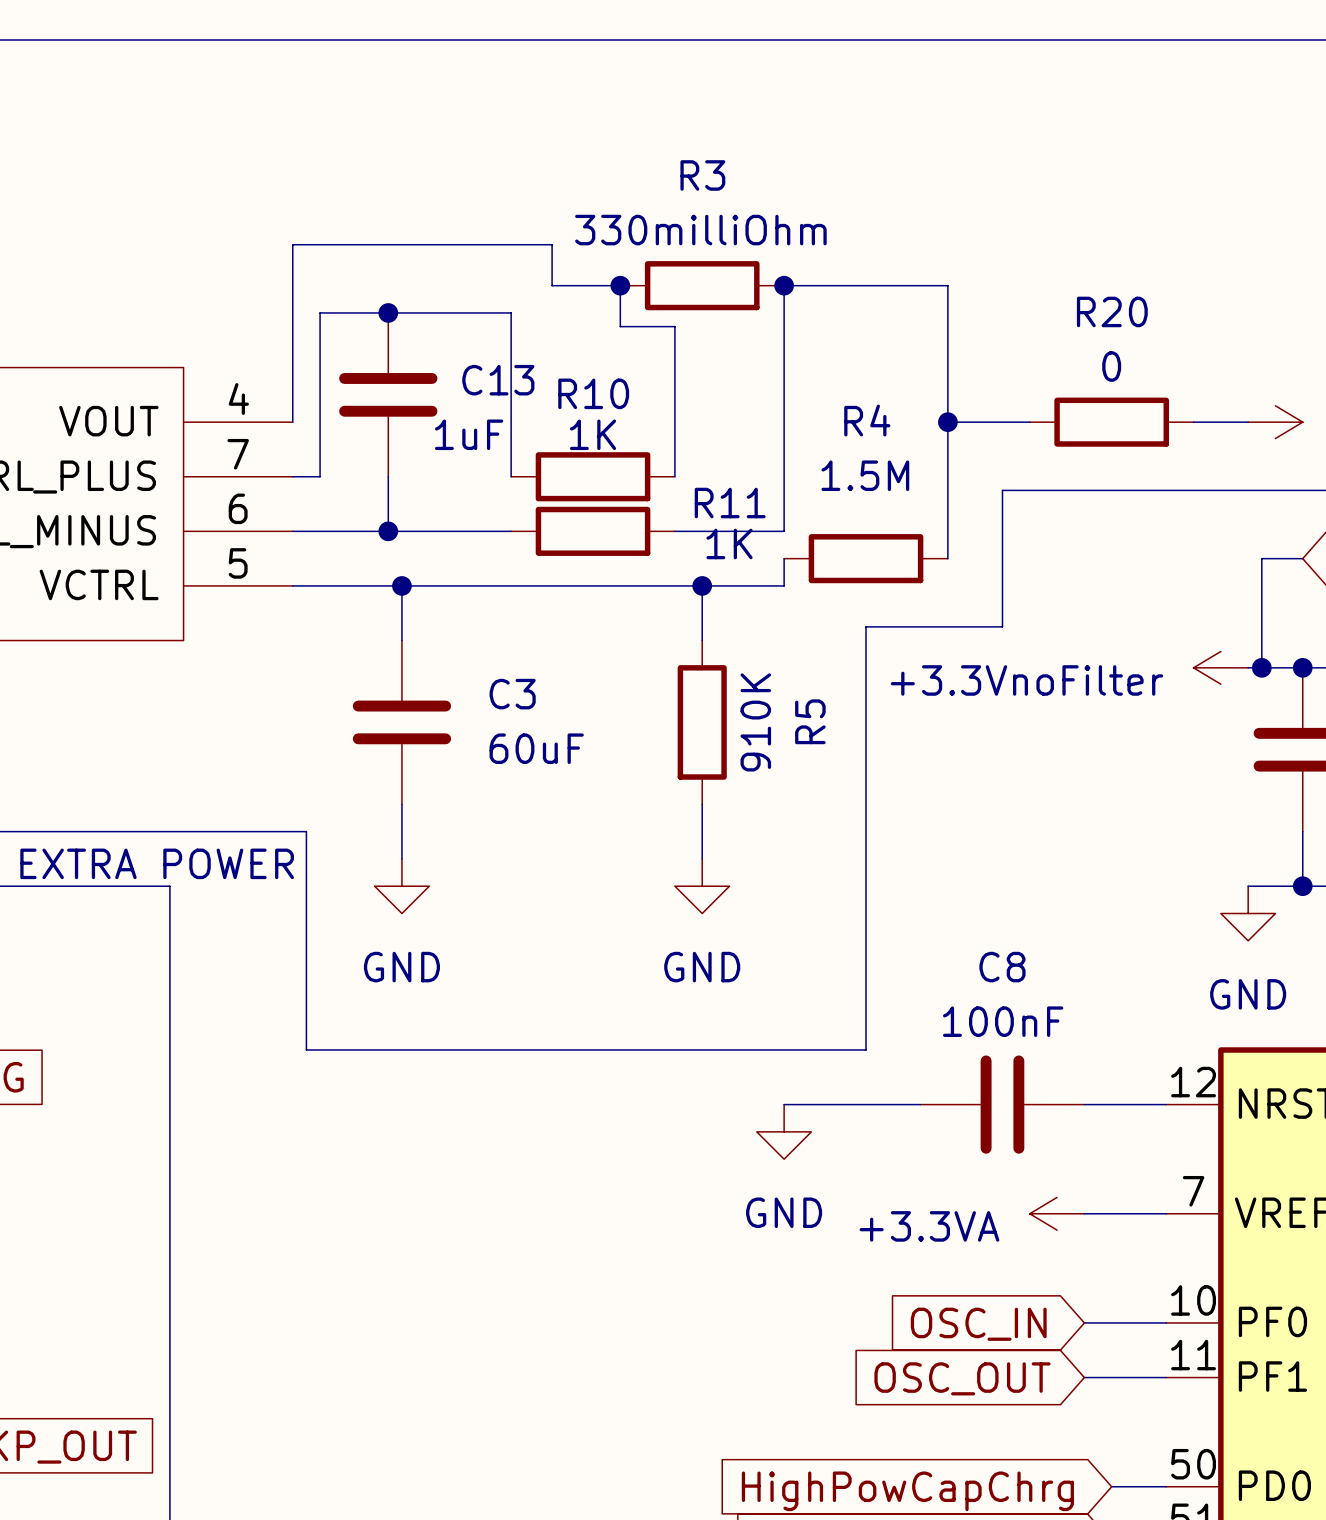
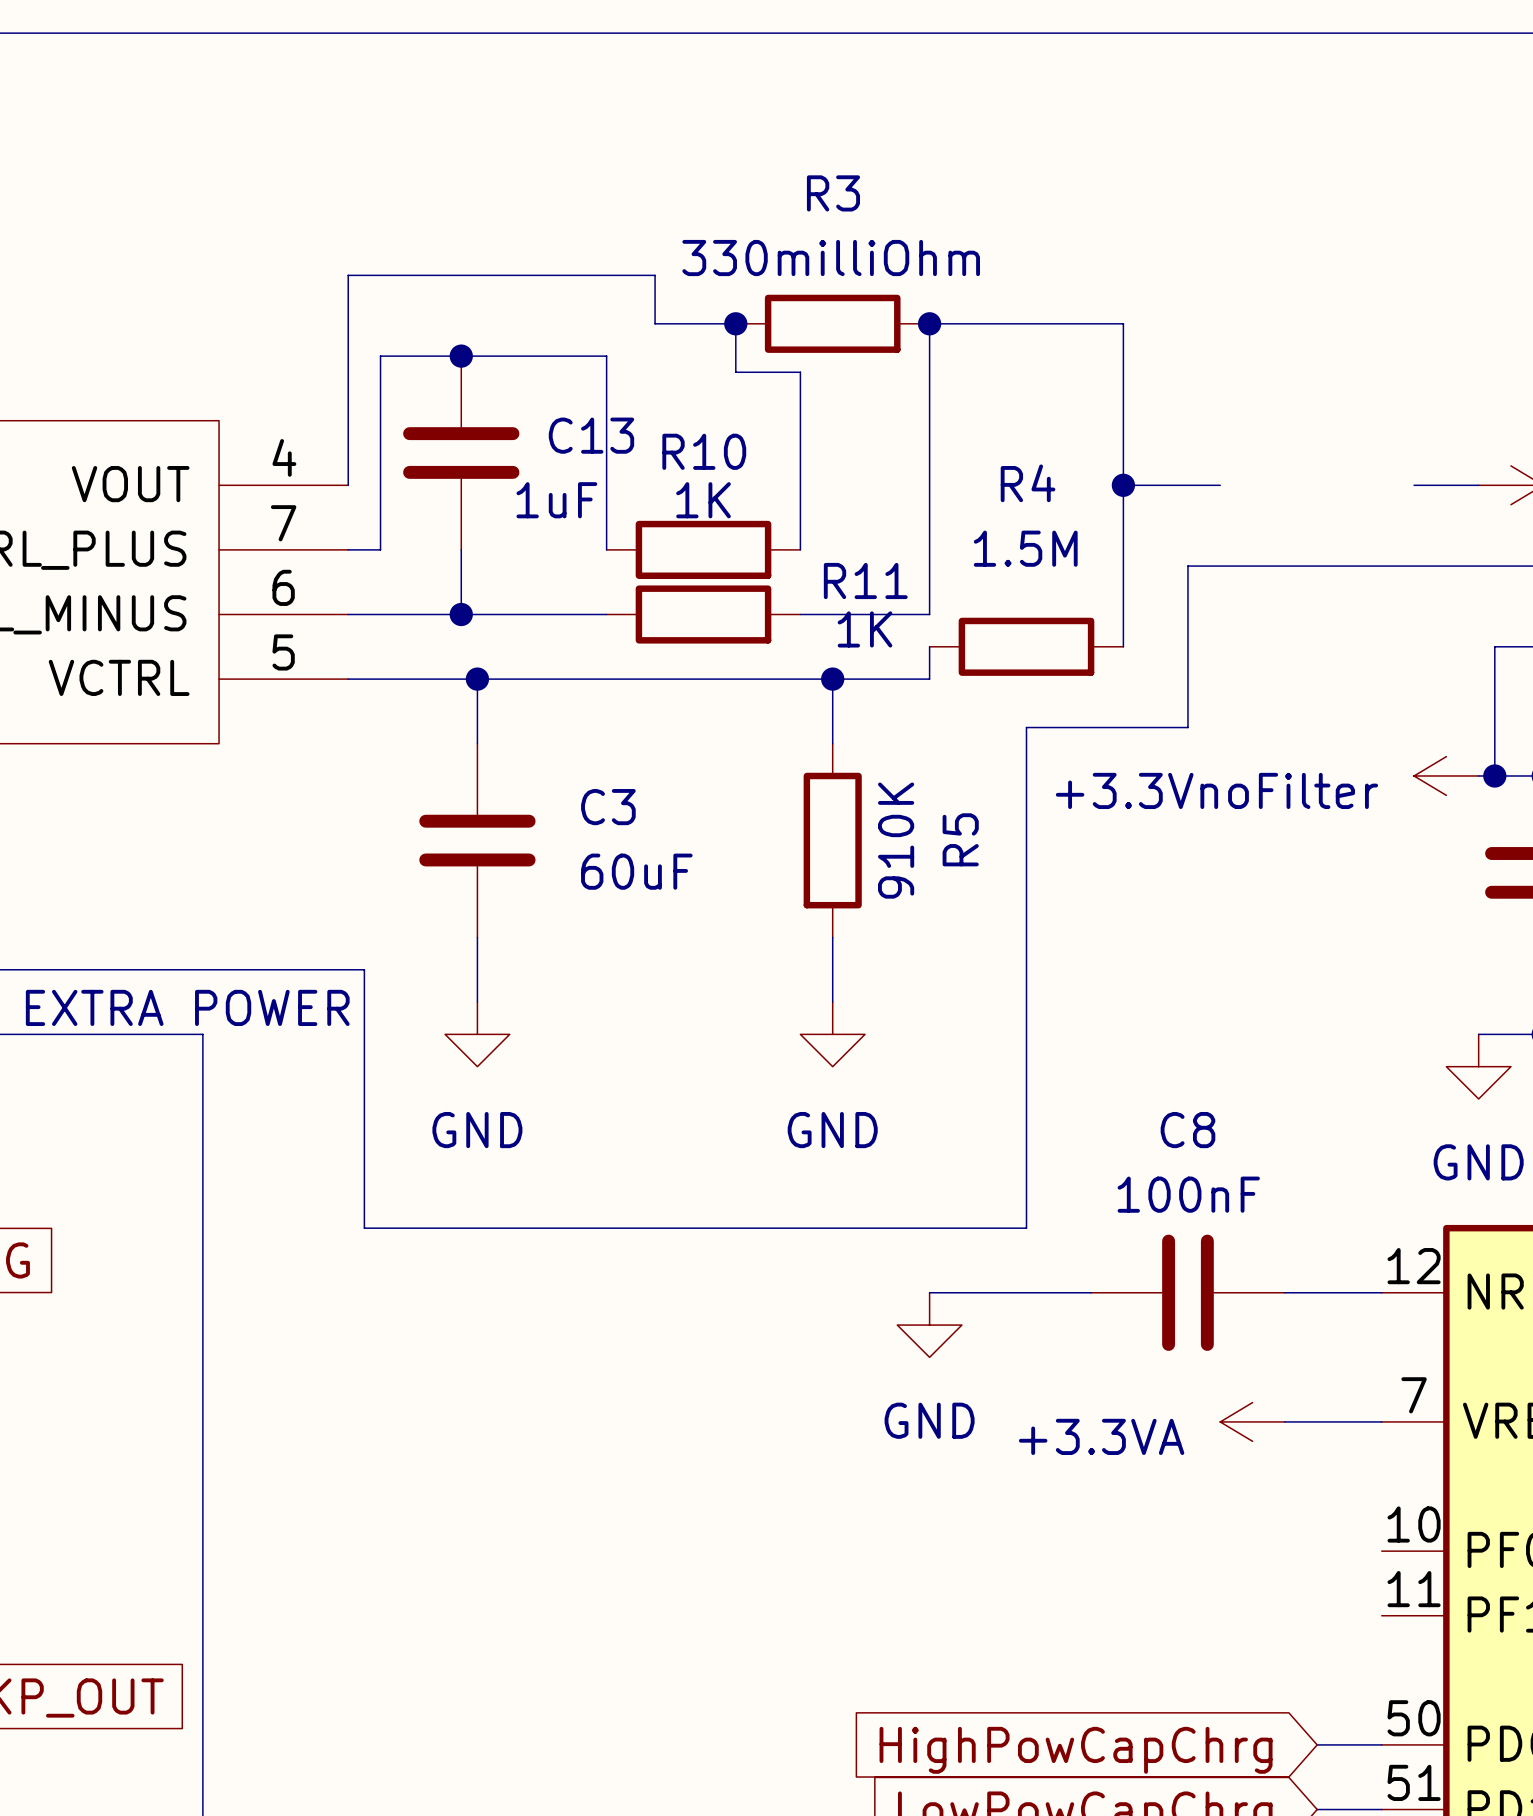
R20: 0 (1111, 422) -> none
wire: (1084, 1322) (1166, 1322) -> none
global label: OSC_IN (978, 1324) -> none
wire: (1084, 1377) (1166, 1377) -> none
global label: OSC_OUT (962, 1378) -> none

